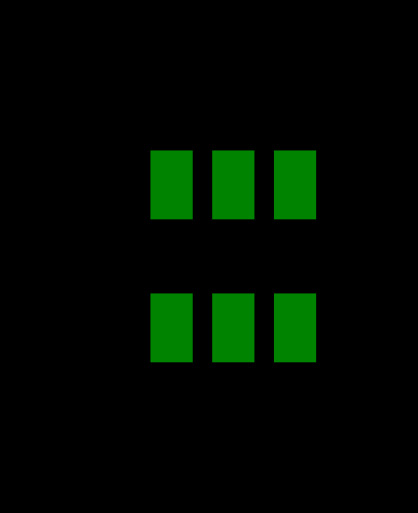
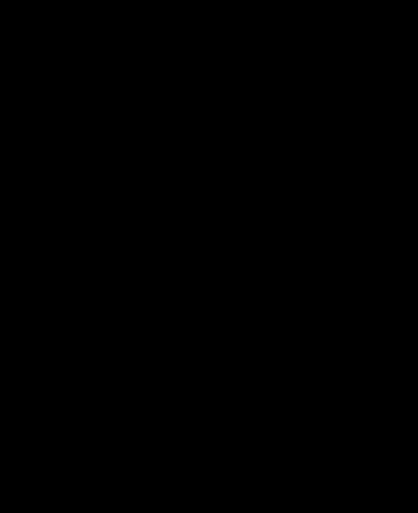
part: (233, 256) -> none

